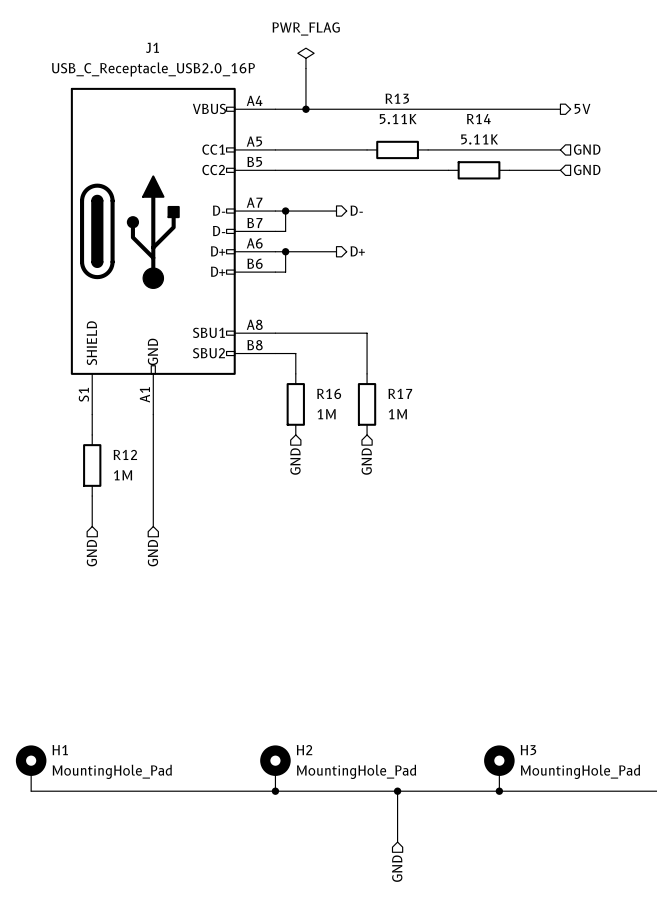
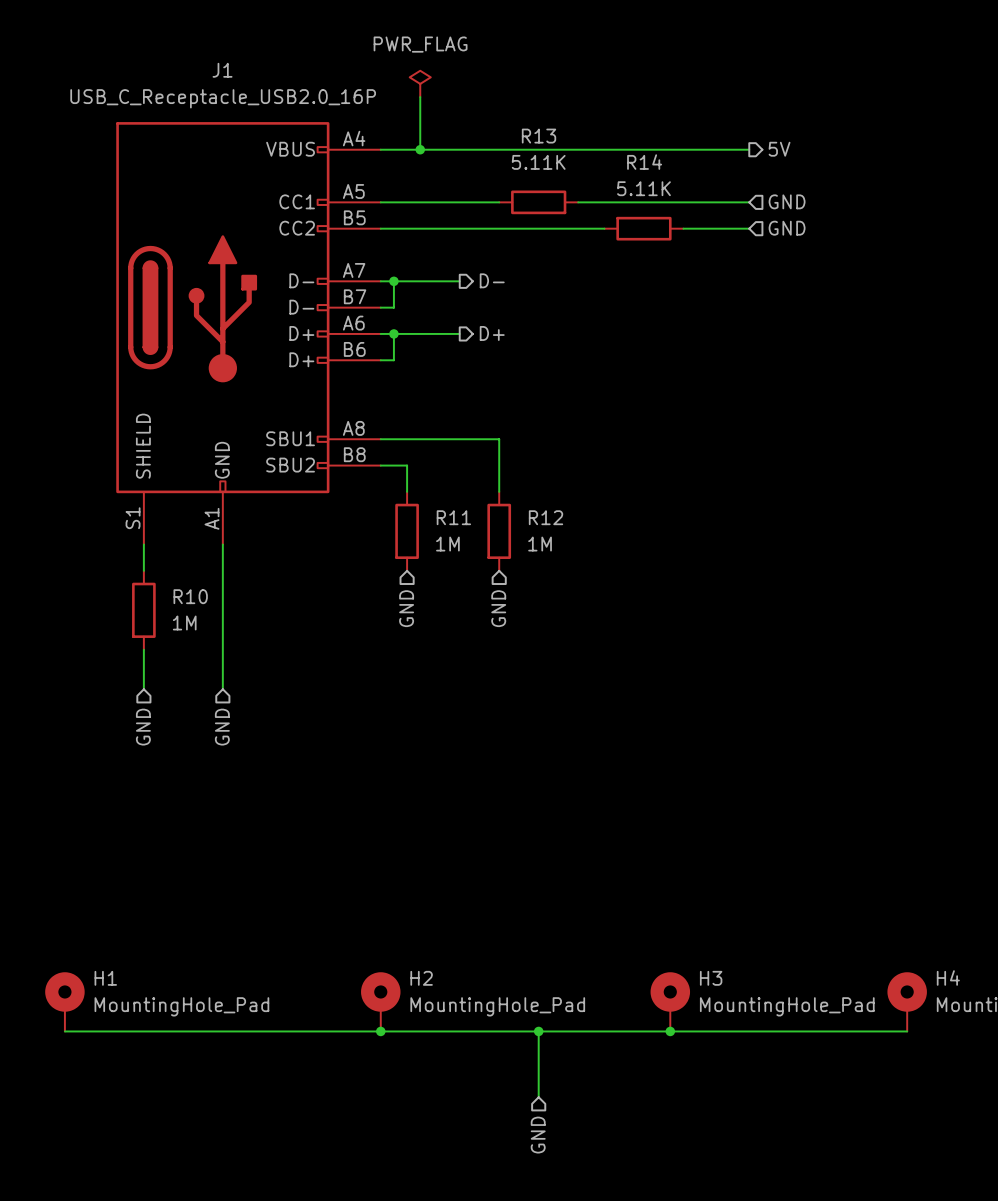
R16 name: R16 (329, 393) -> R11 (453, 517)
R17 name: R17 (400, 393) -> R12 (546, 517)
R12 name: R12 (125, 454) -> R10 (190, 596)

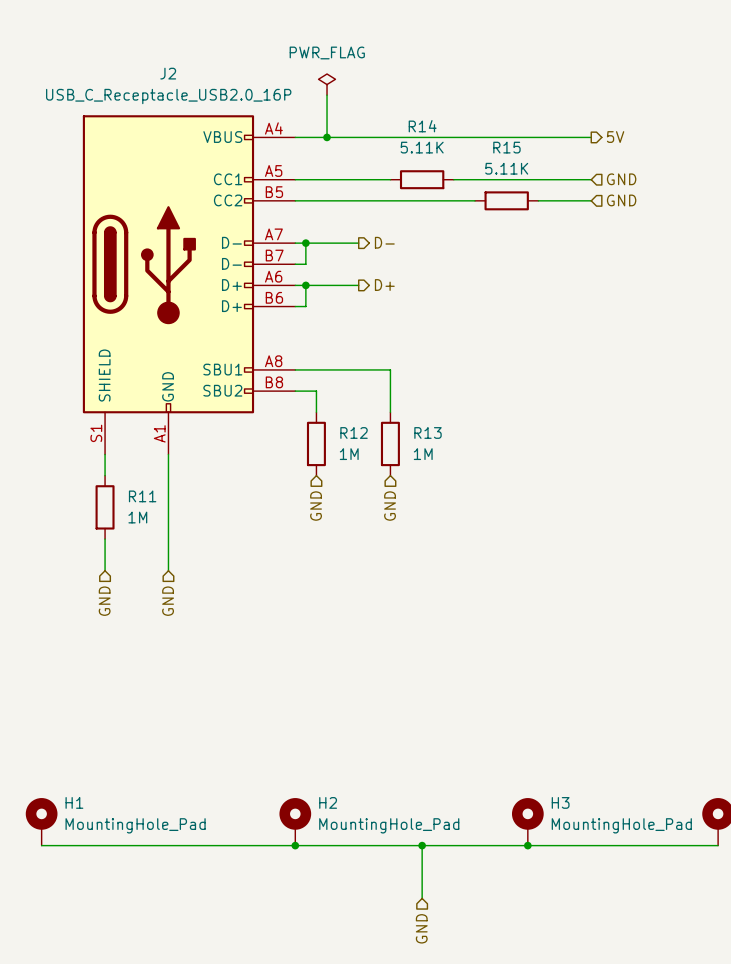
J1 name: J1 (222, 70) -> J2 (168, 73)
R13 name: R13 (539, 136) -> R14 (422, 126)
R14 name: R14 (644, 162) -> R15 (506, 147)
R11 name: R11 (453, 517) -> R12 (354, 432)
R12 name: R12 (546, 517) -> R13 (428, 432)
R10 name: R10 (190, 596) -> R11 (142, 496)

